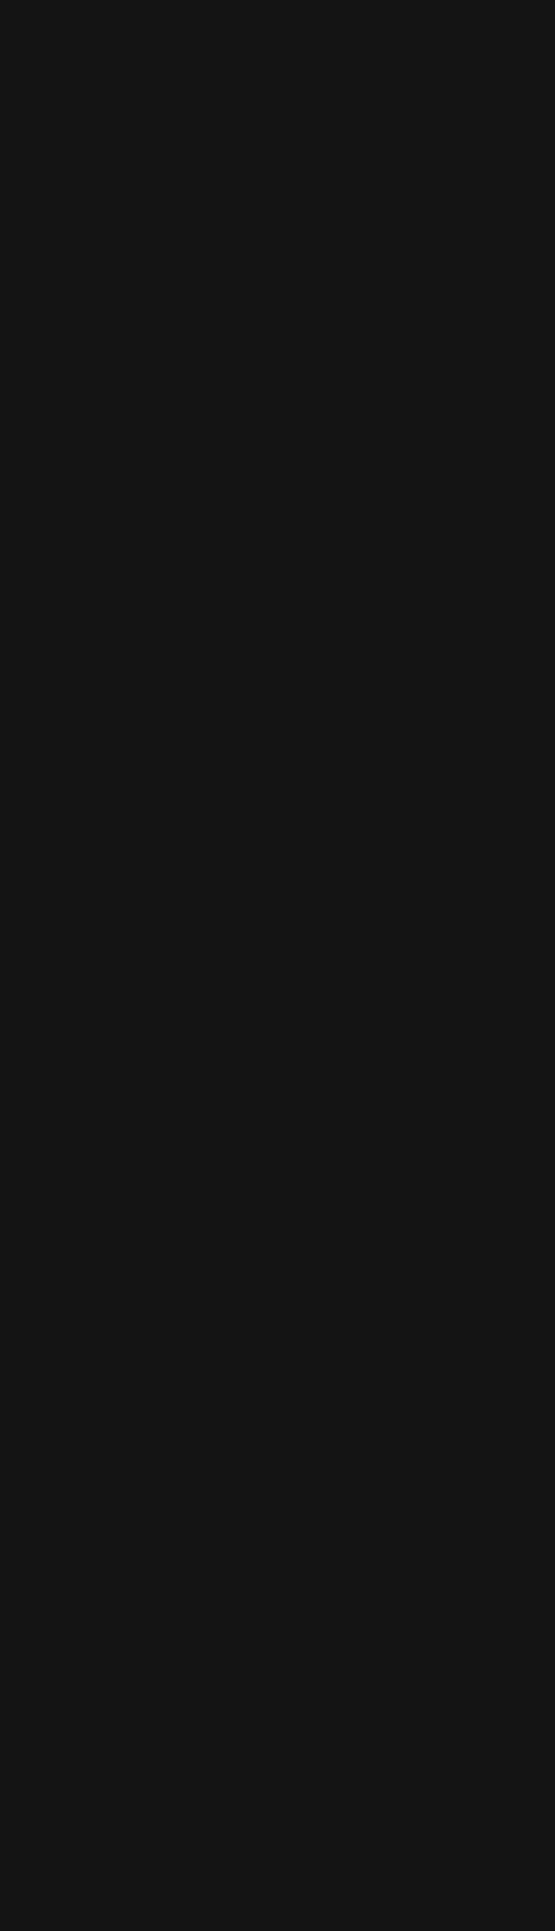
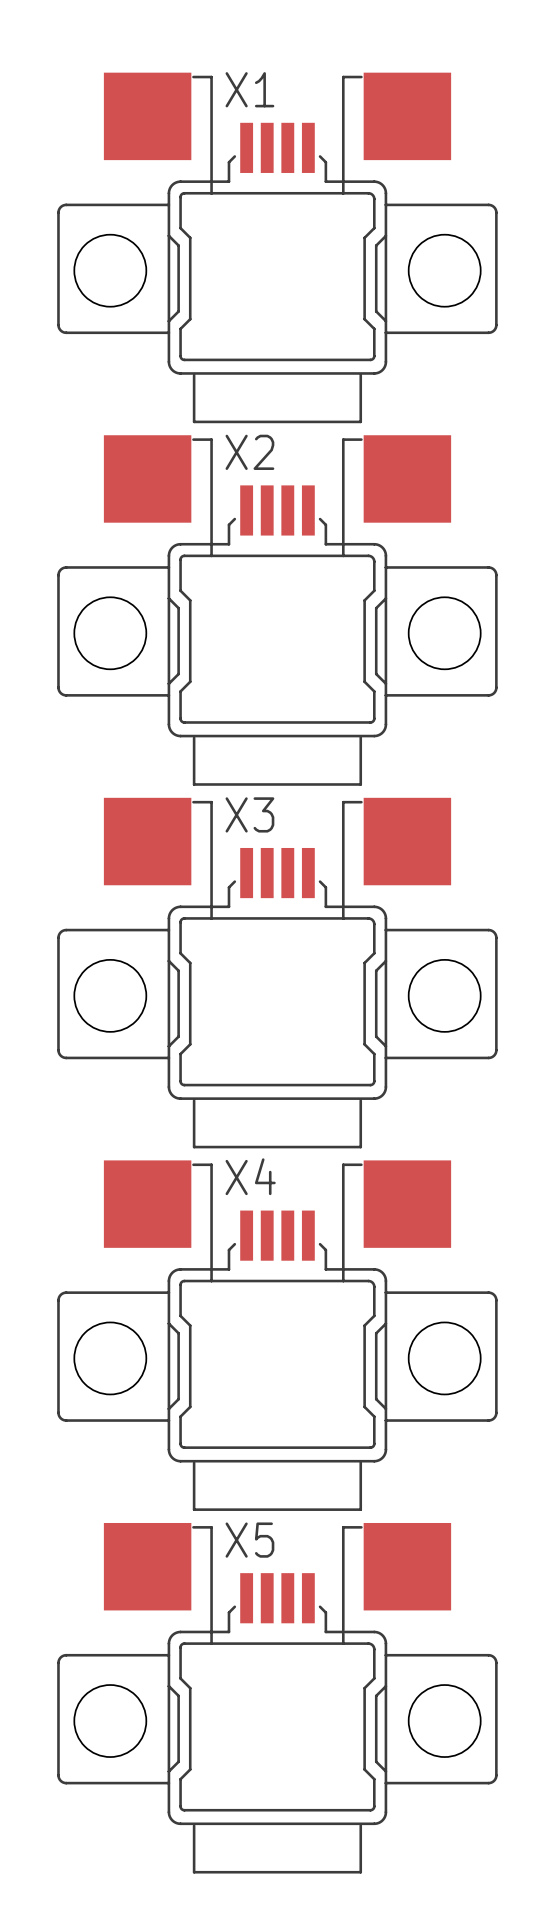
X1: none -> (277, 247)
X2: none -> (277, 610)
X3: none -> (277, 973)
X4: none -> (277, 1335)
X5: none -> (277, 1698)

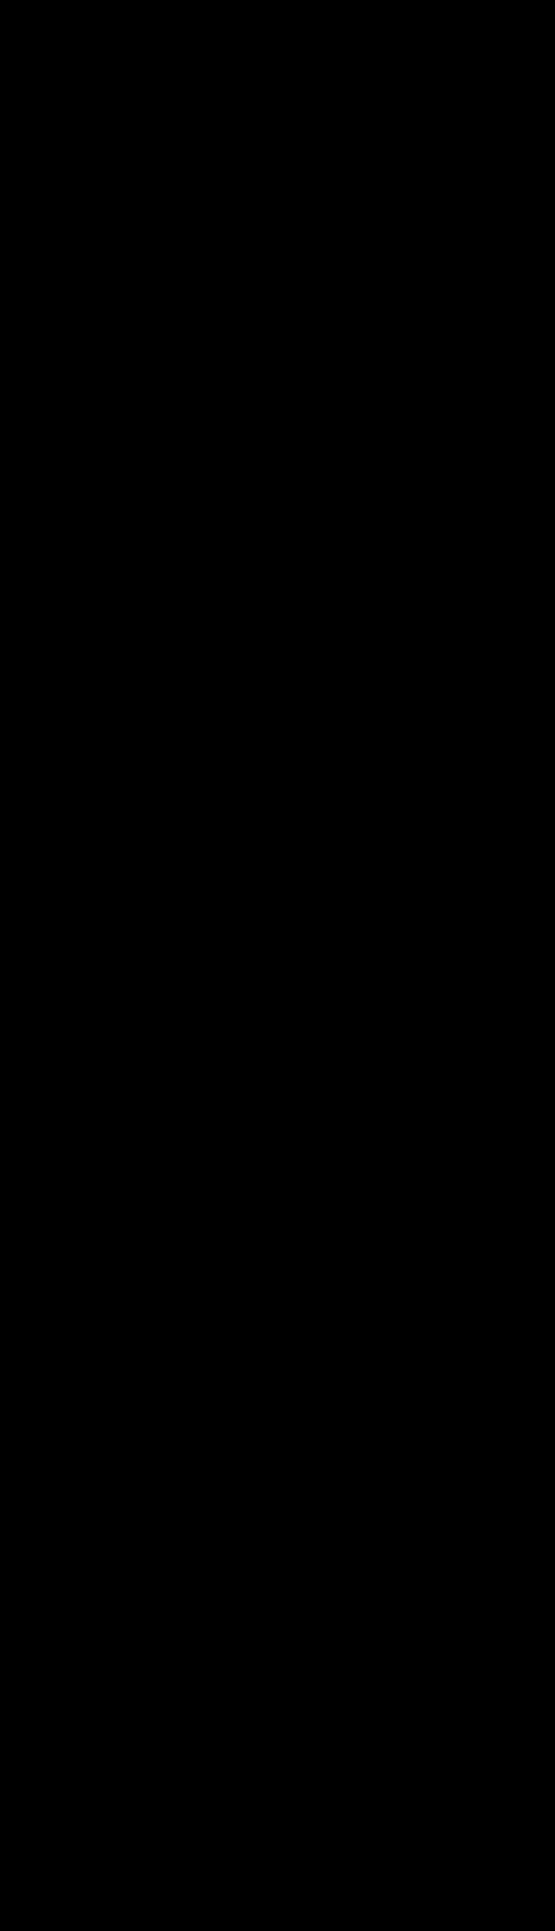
X1: (277, 247) -> none
X2: (277, 610) -> none
X3: (277, 973) -> none
X4: (277, 1335) -> none
X5: (277, 1698) -> none

